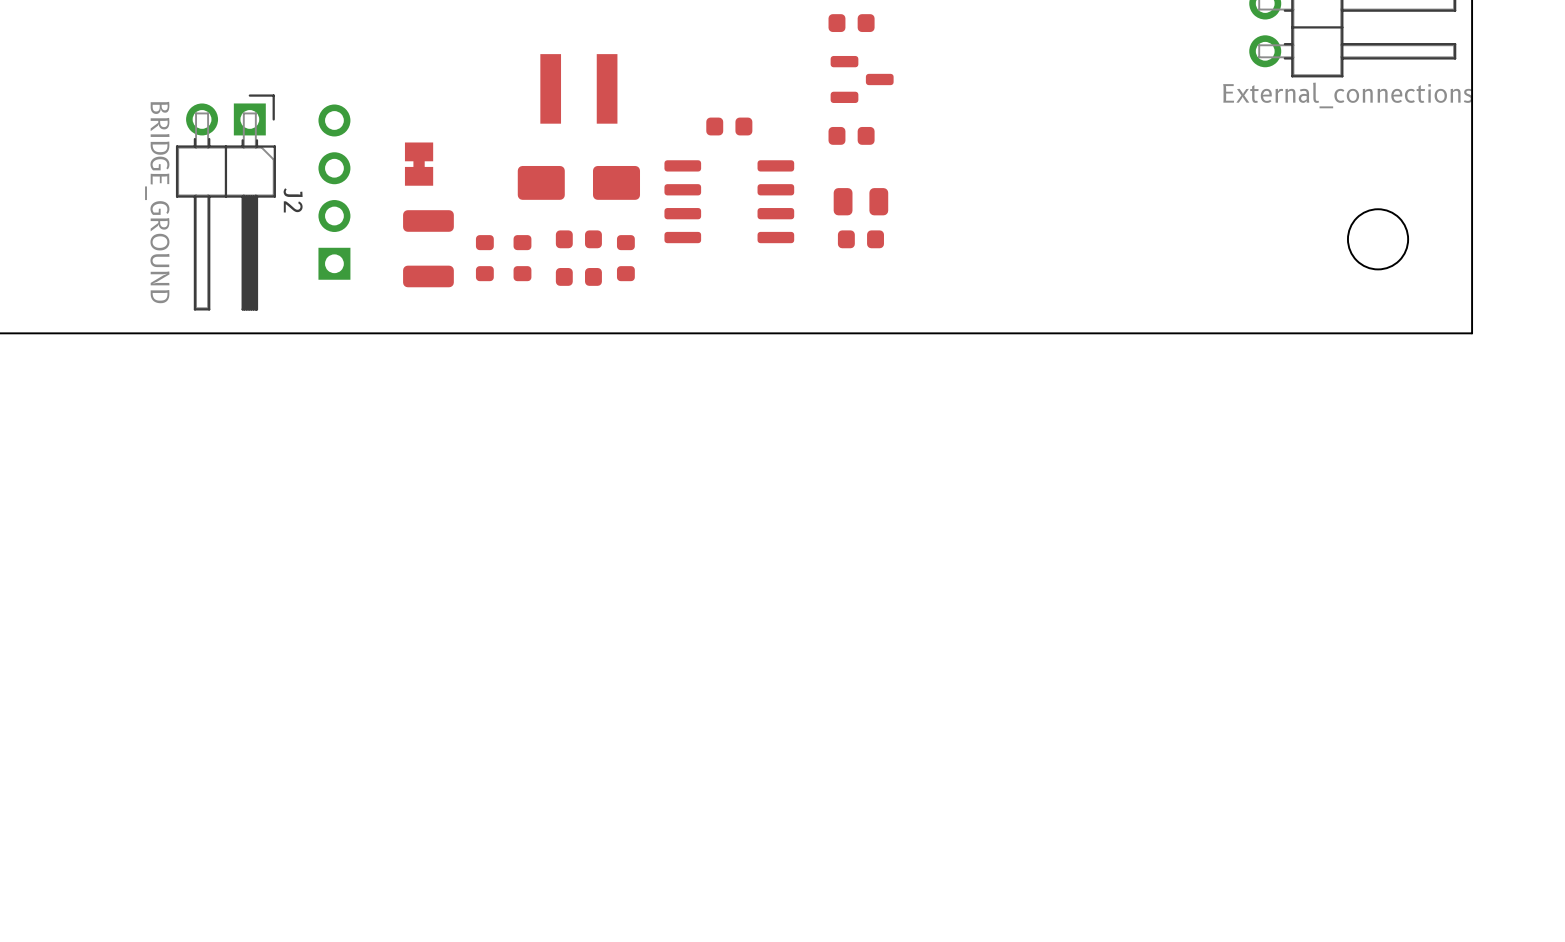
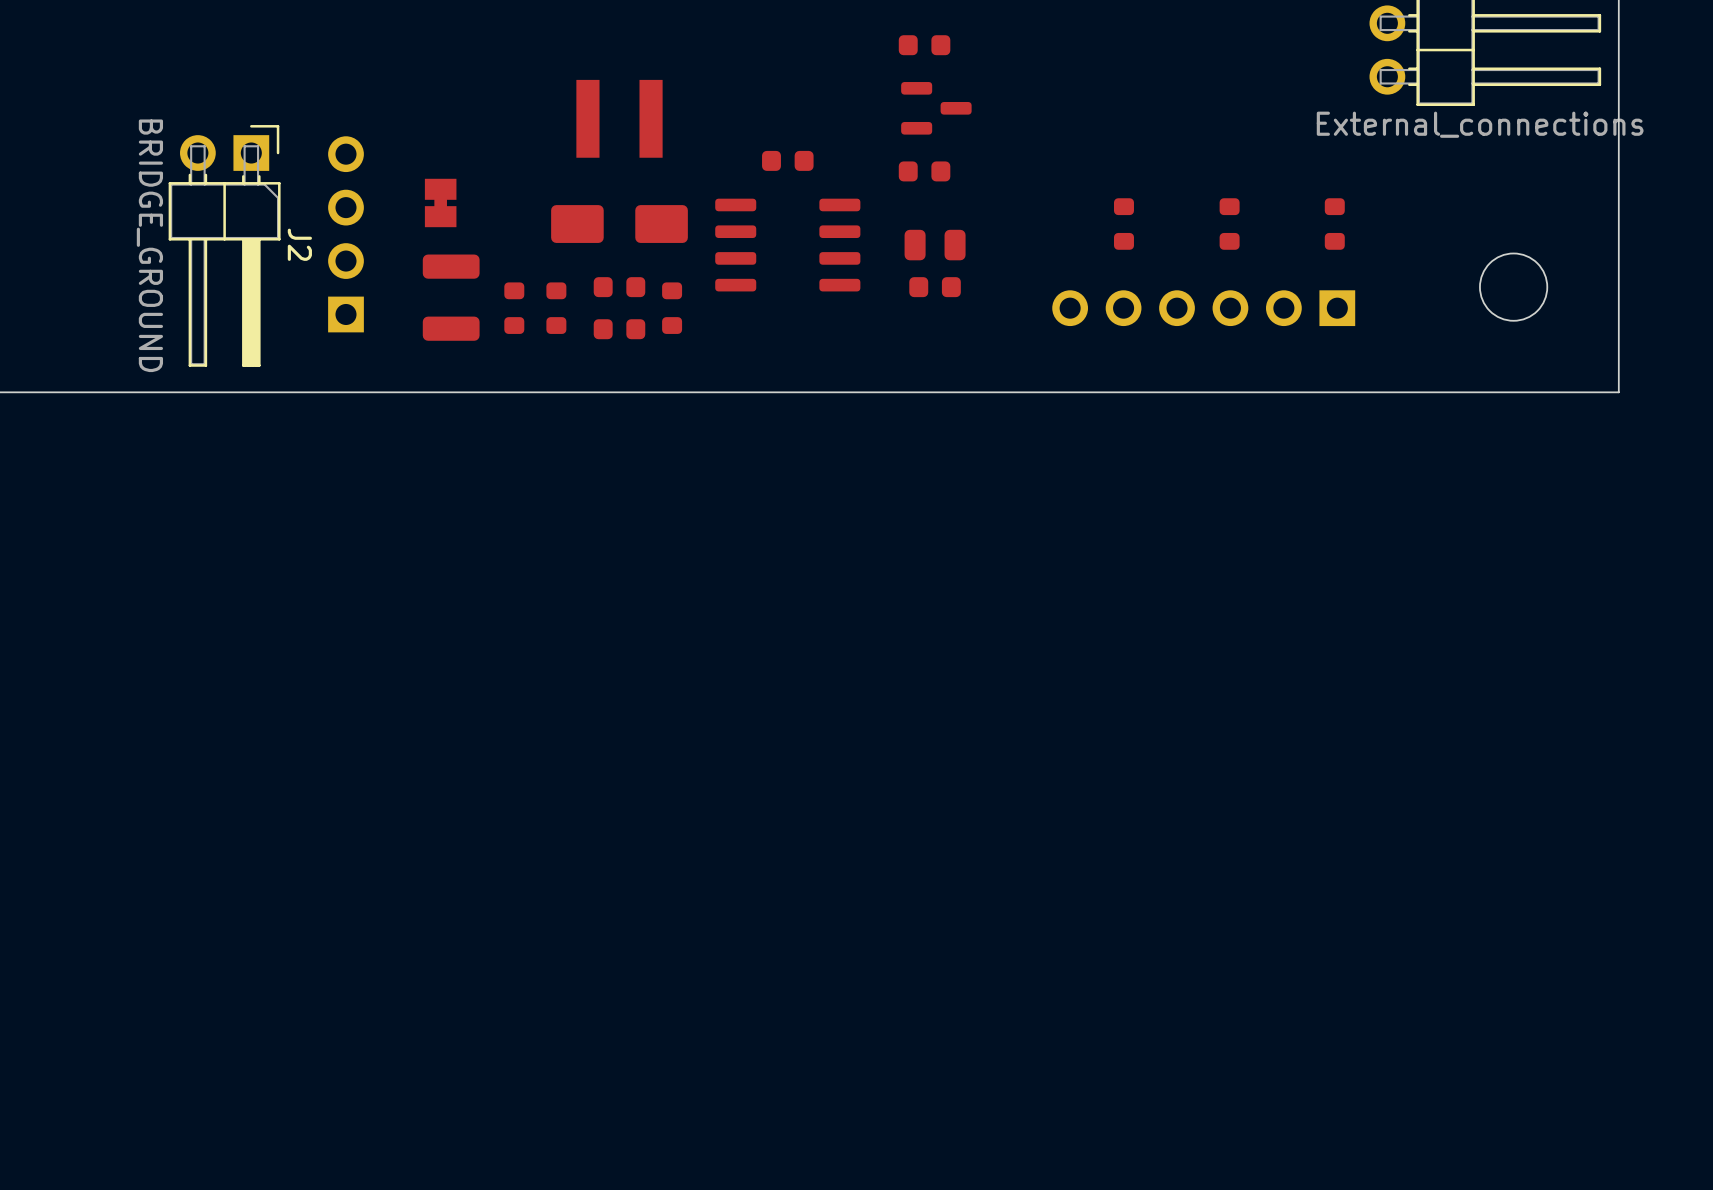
part: none -> (1123, 224)
part: none -> (1229, 224)
part: none -> (1334, 224)
part: none -> (1203, 308)

